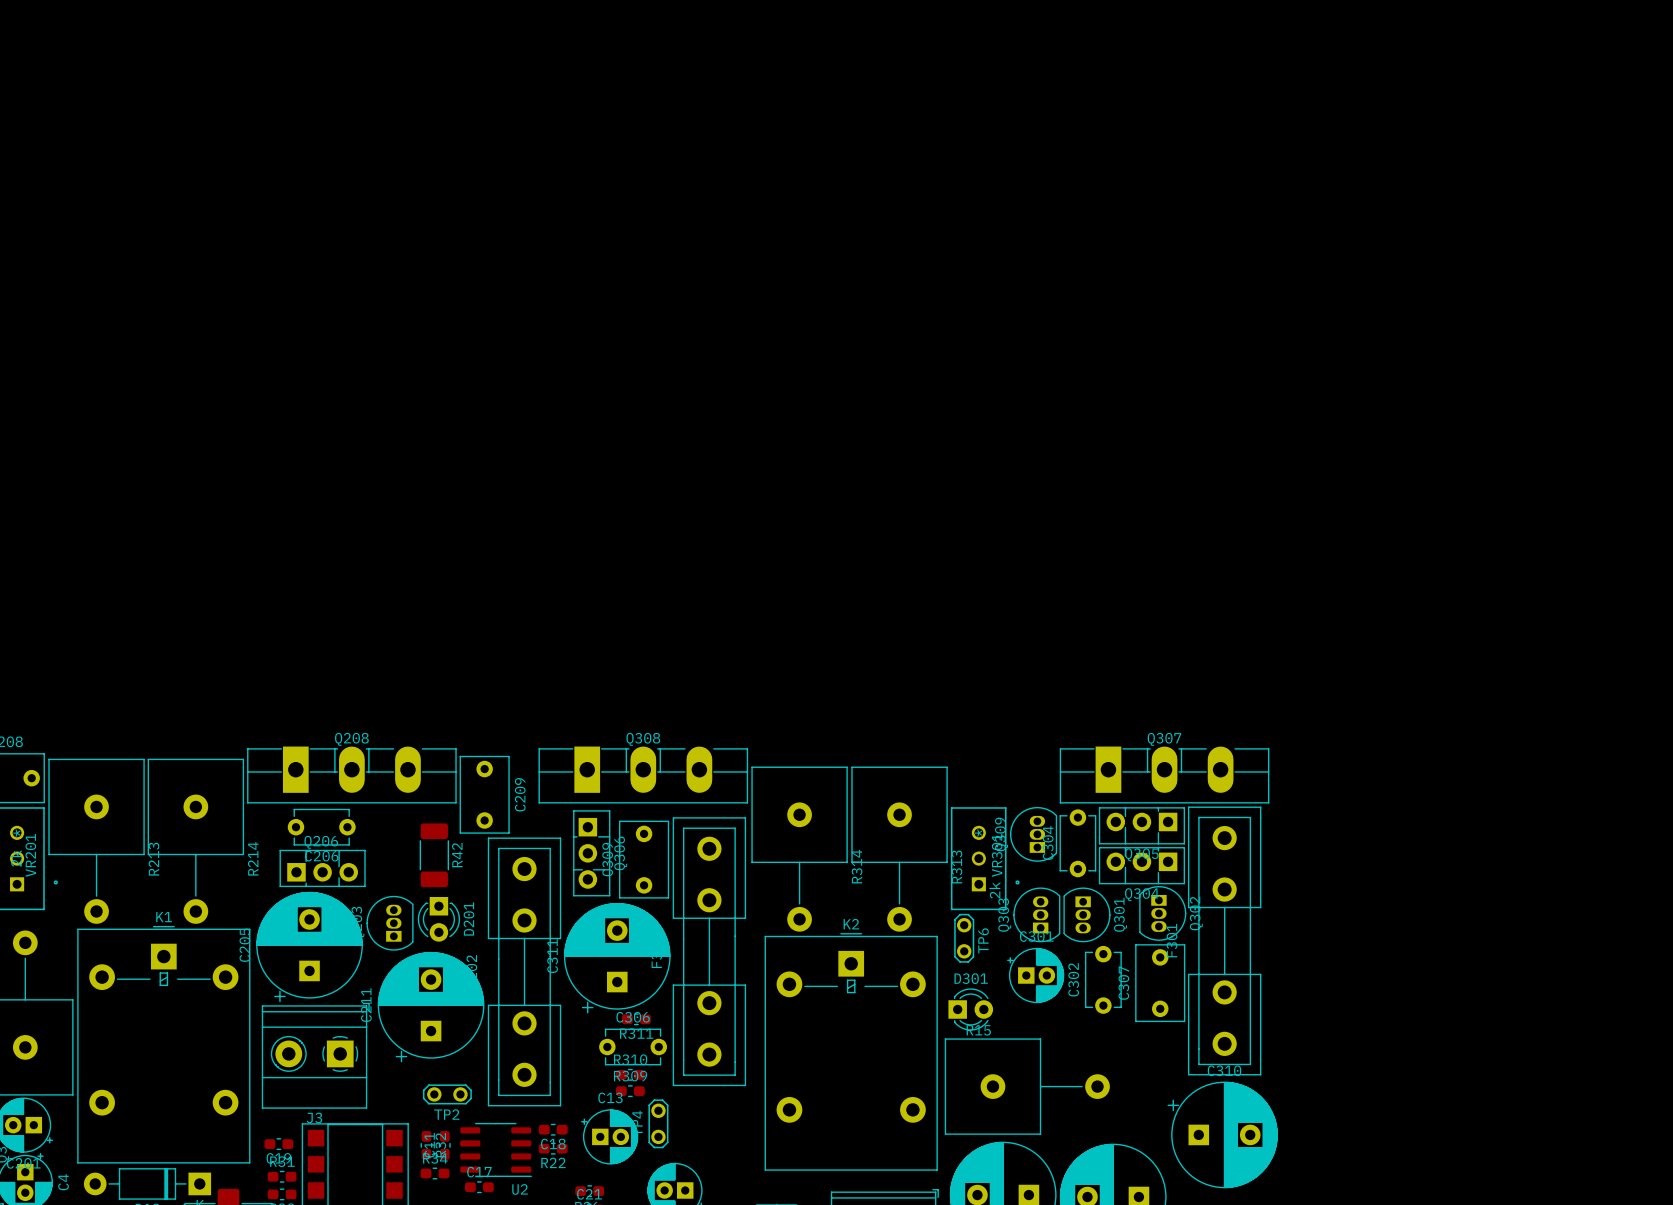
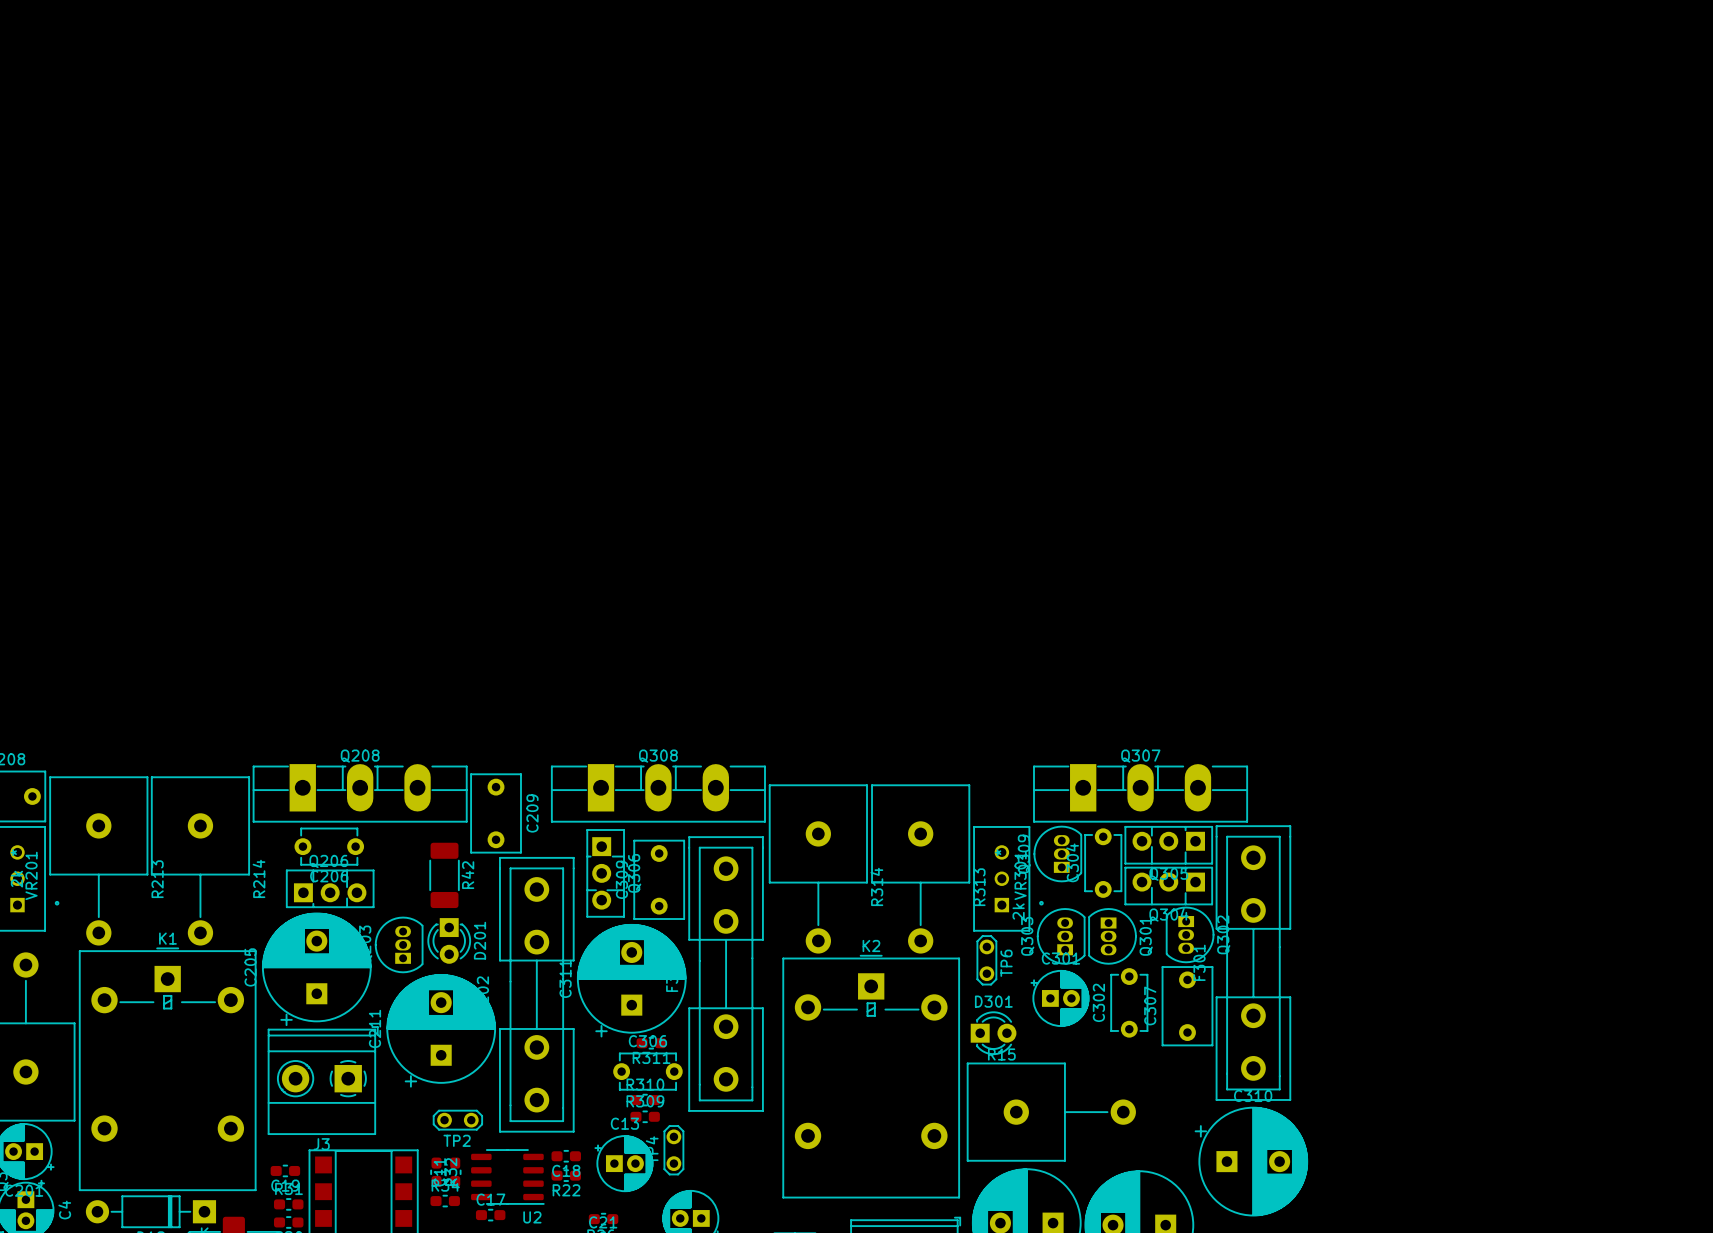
Q307 position: (1164, 775) -> (1140, 793)

